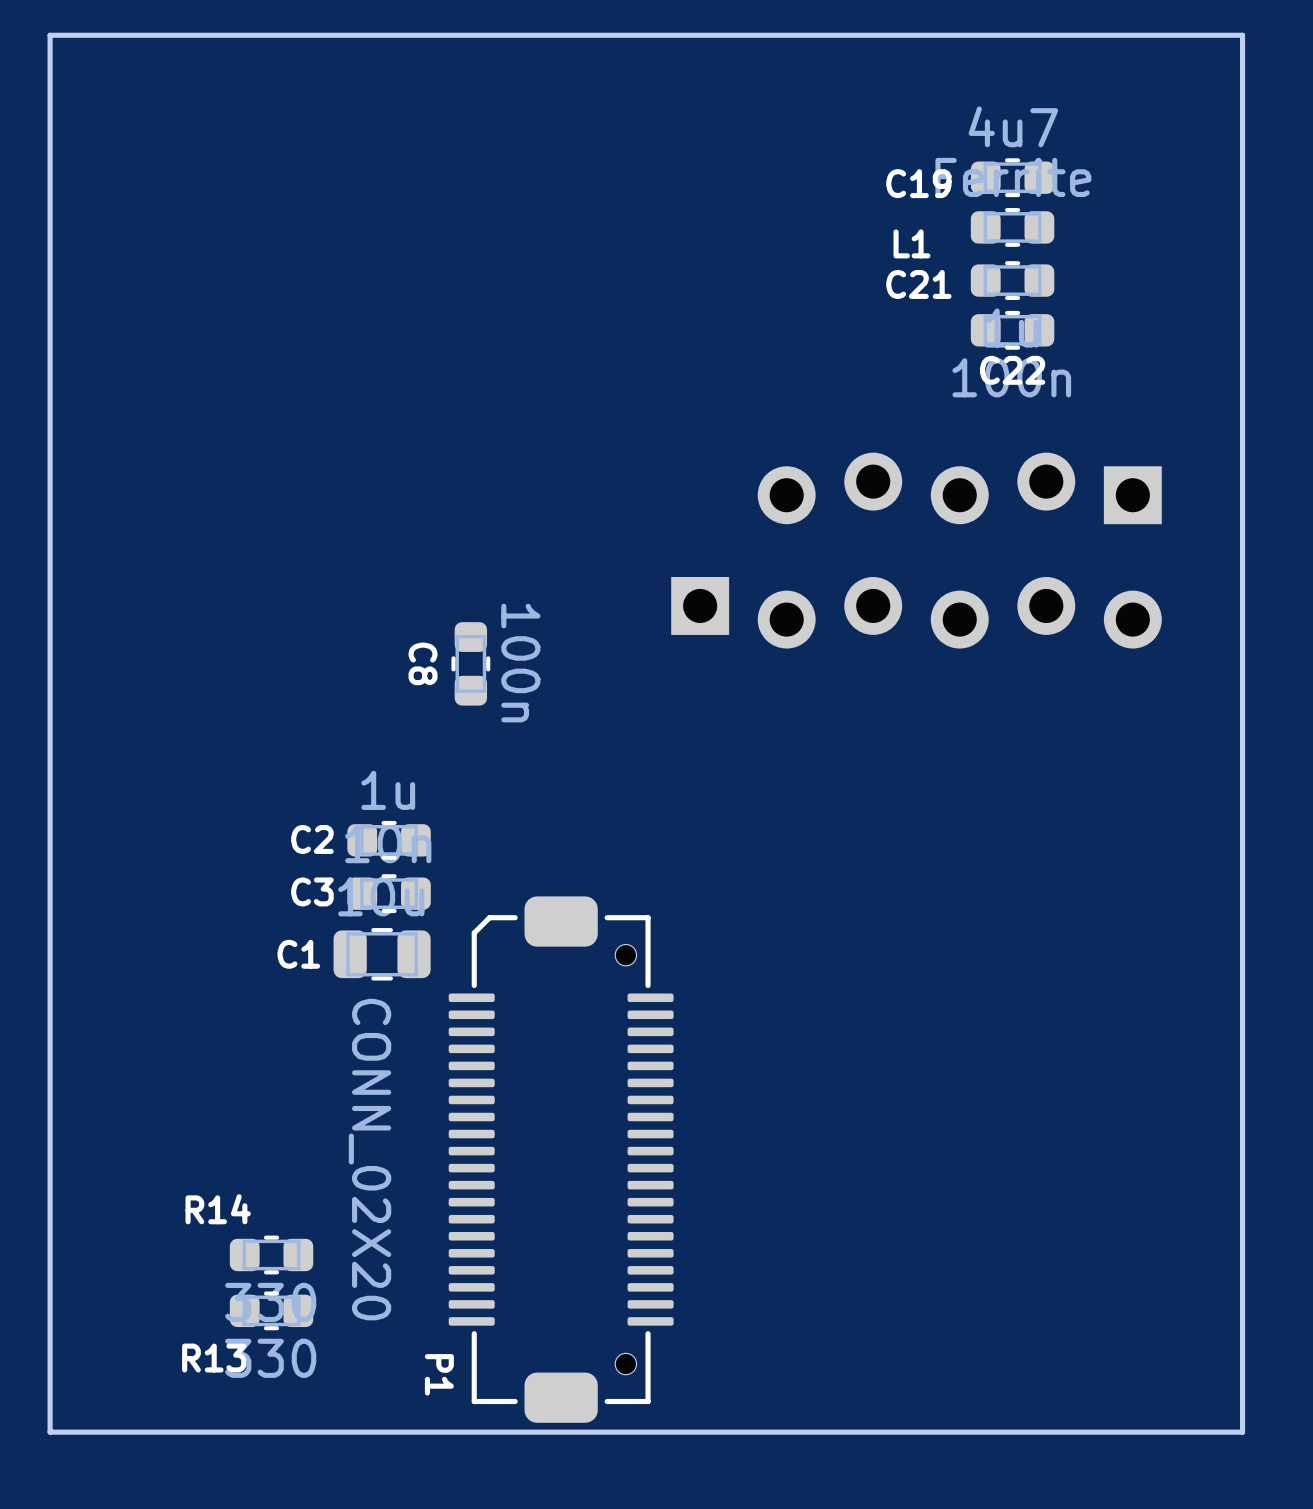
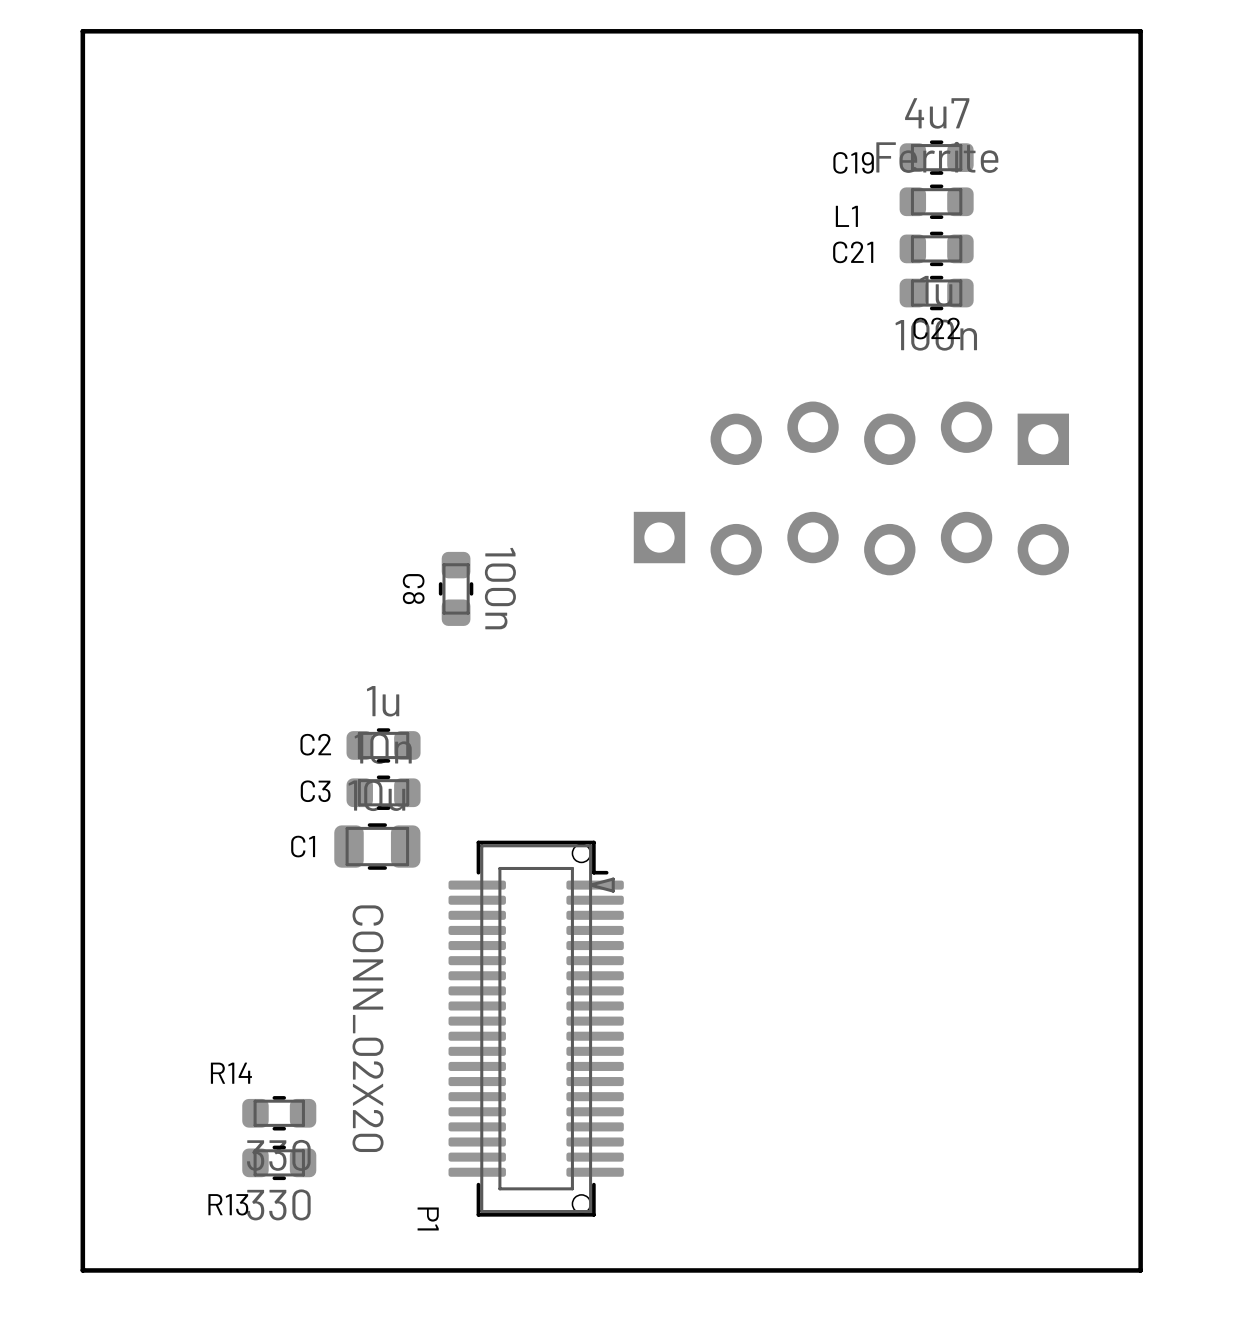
P1 footprint: [448, 896, 674, 1423] -> [448, 840, 624, 1217]

